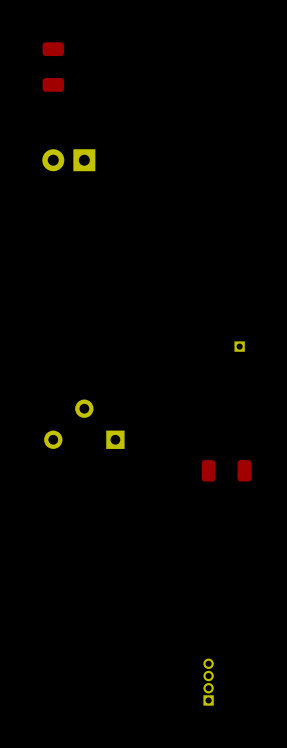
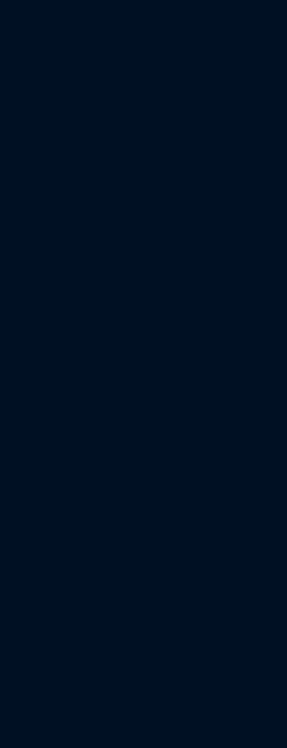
part: (53, 67) -> none
part: (68, 160) -> none
part: (239, 346) -> none
part: (84, 424) -> none
part: (226, 470) -> none
part: (208, 682) -> none

